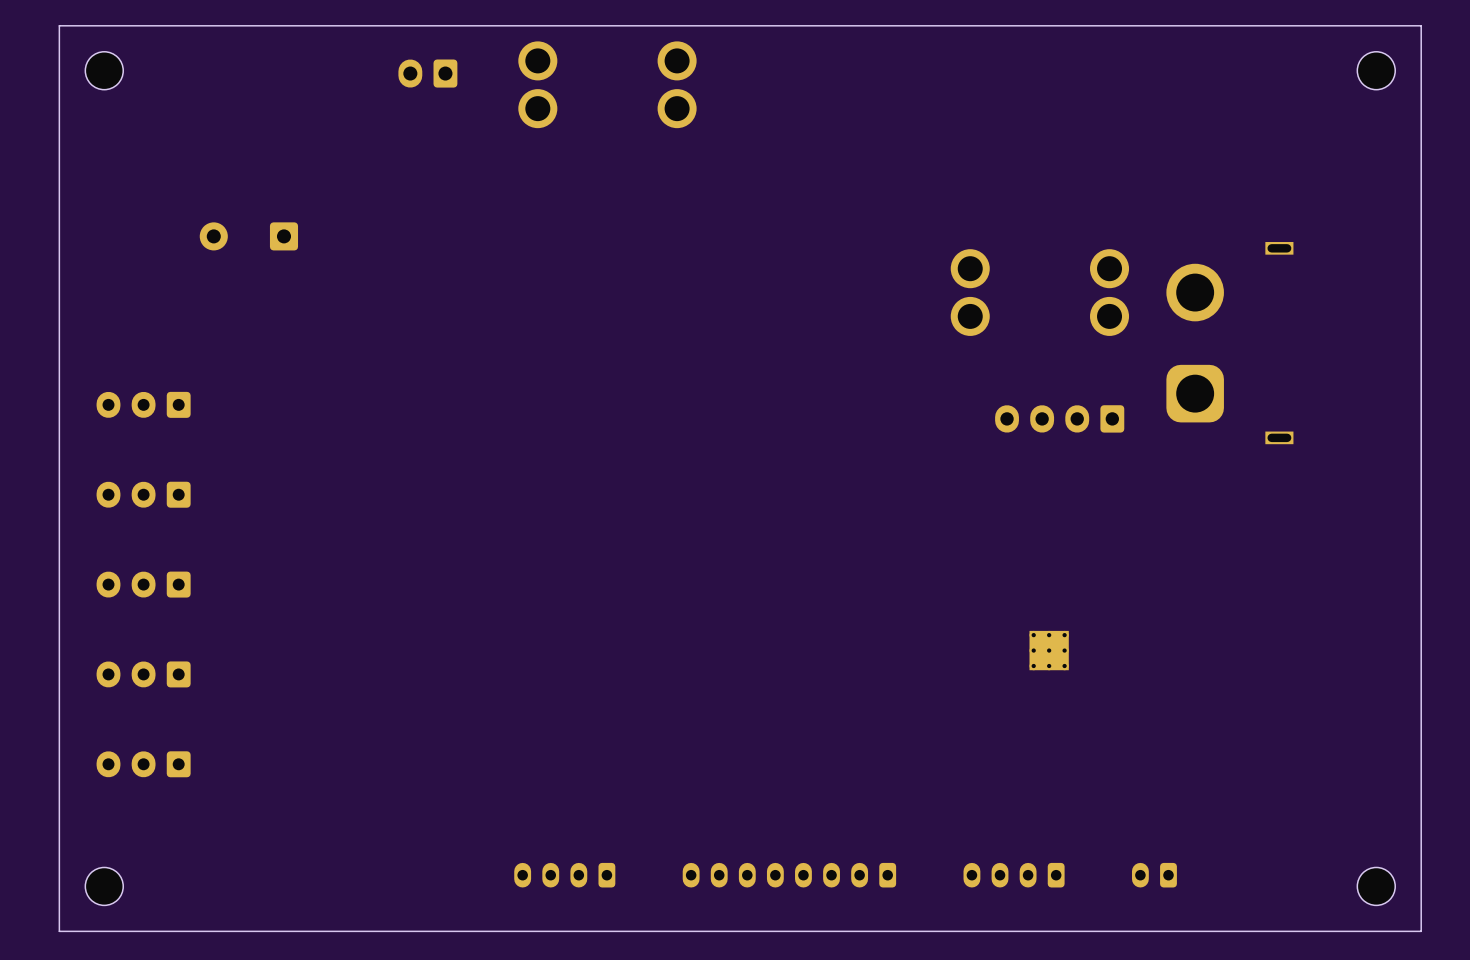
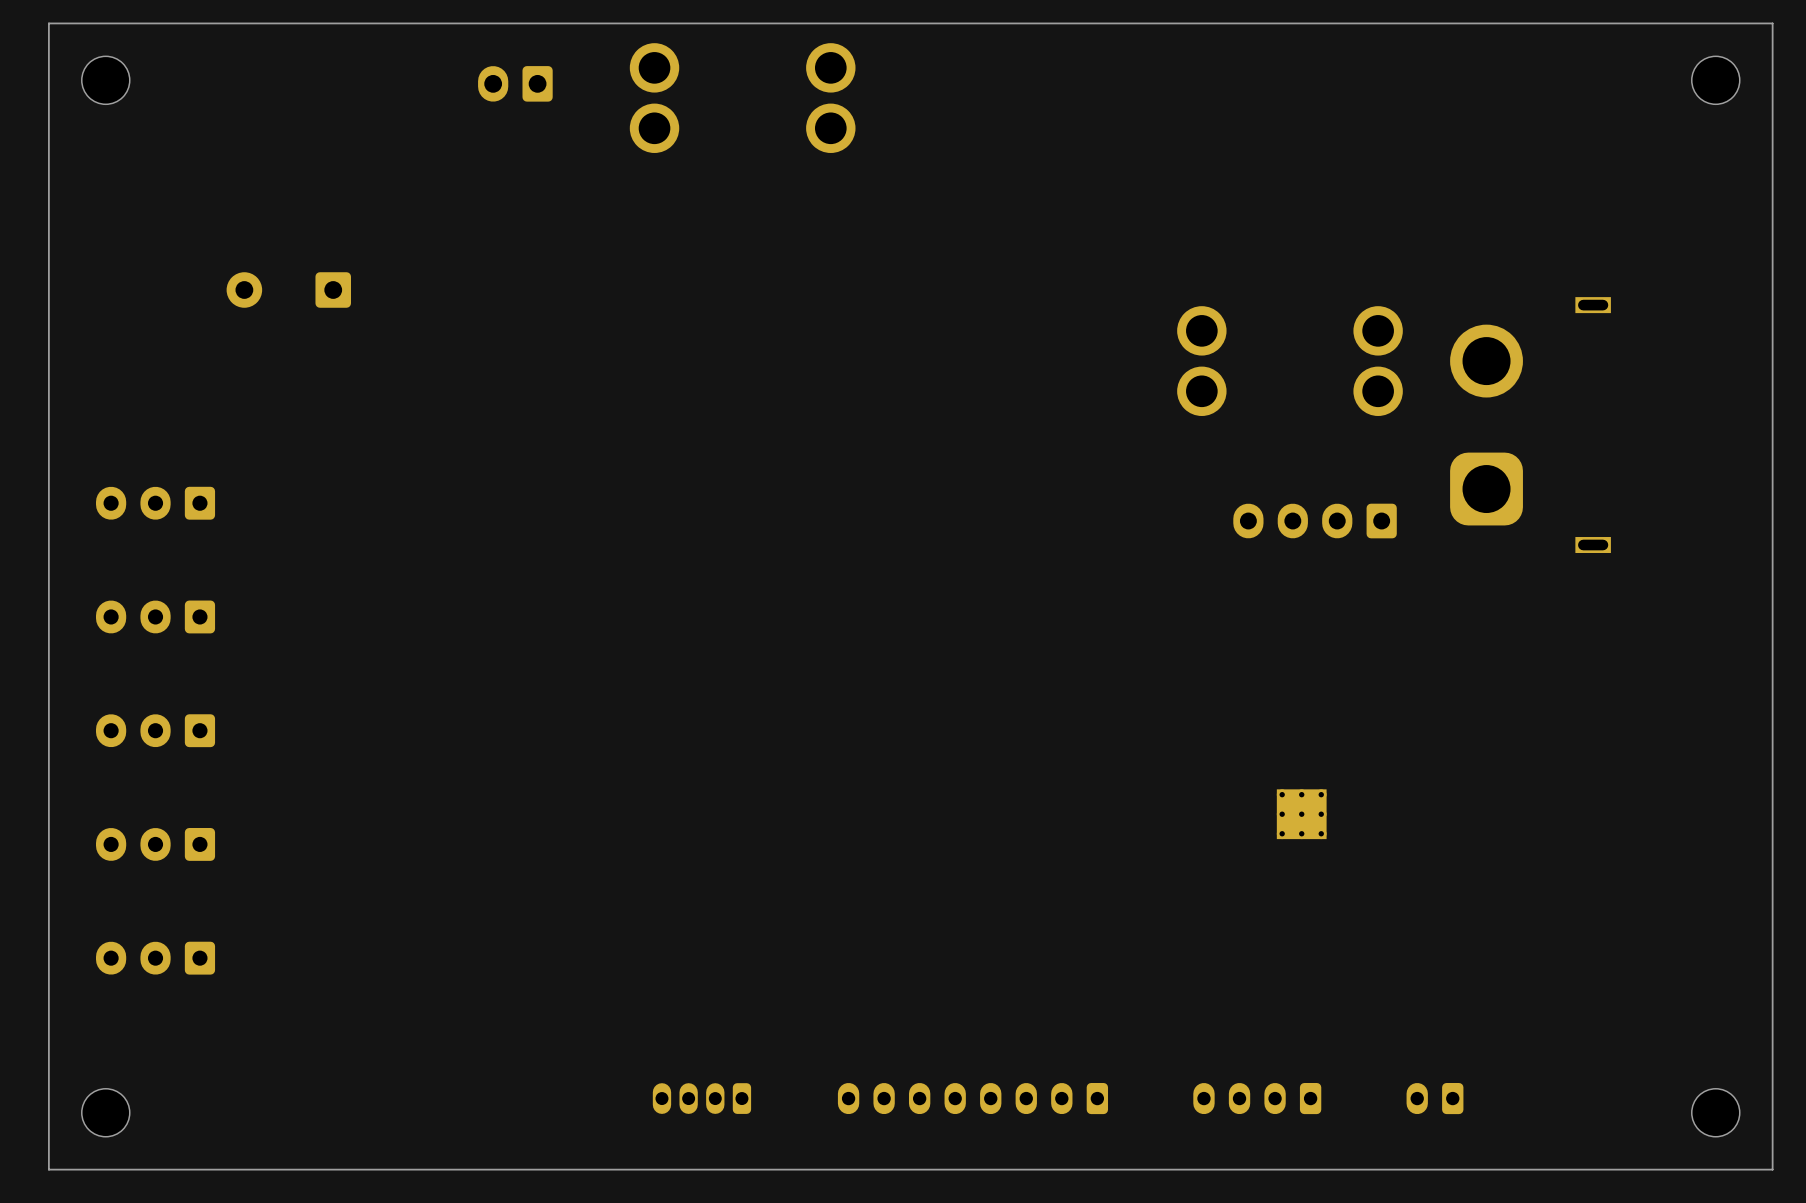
part footprint: [514, 862, 616, 888] -> [652, 1083, 752, 1114]

